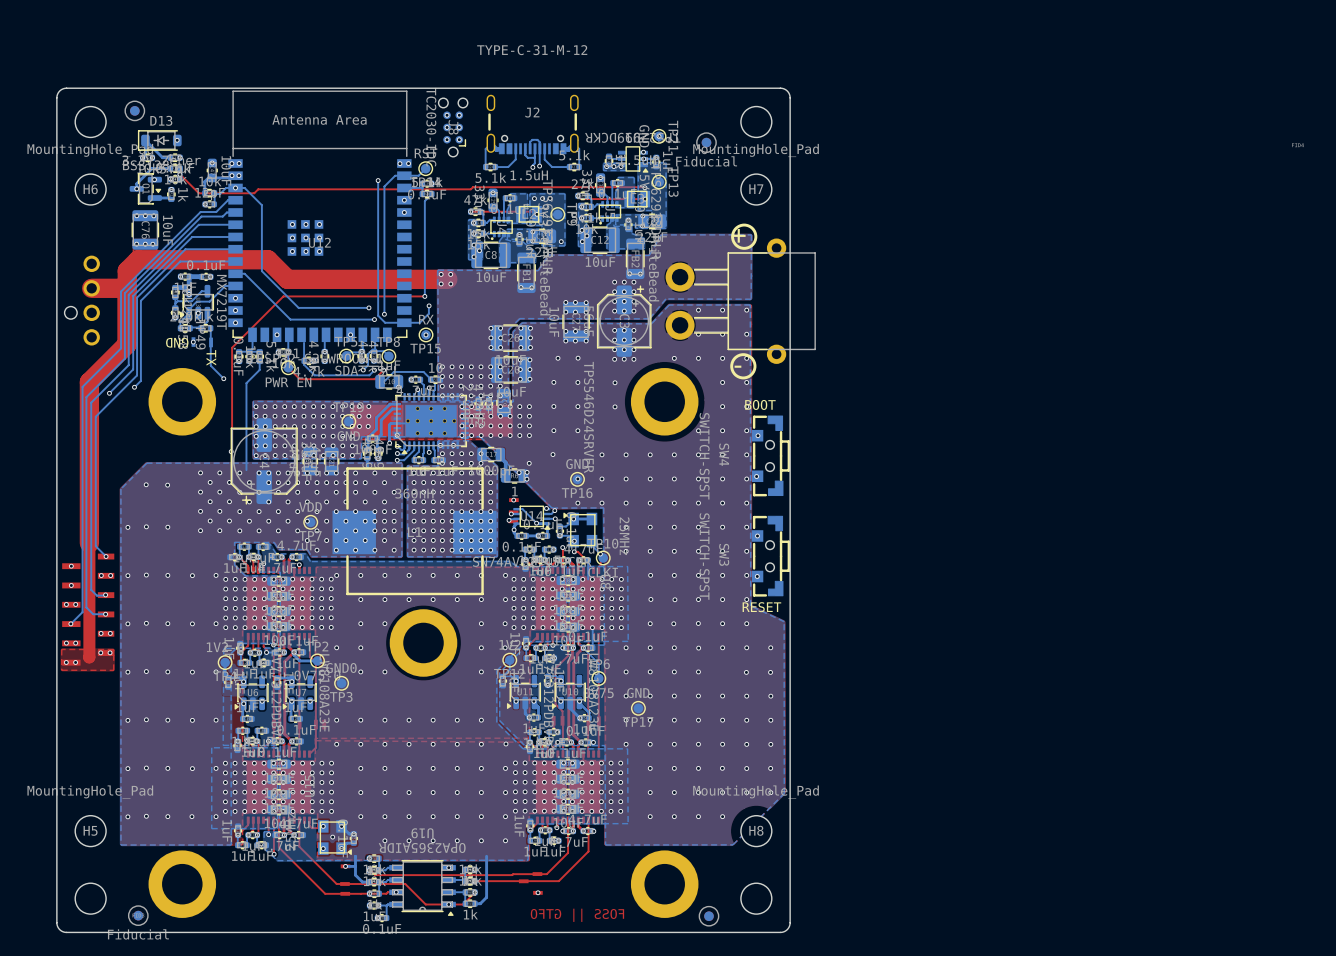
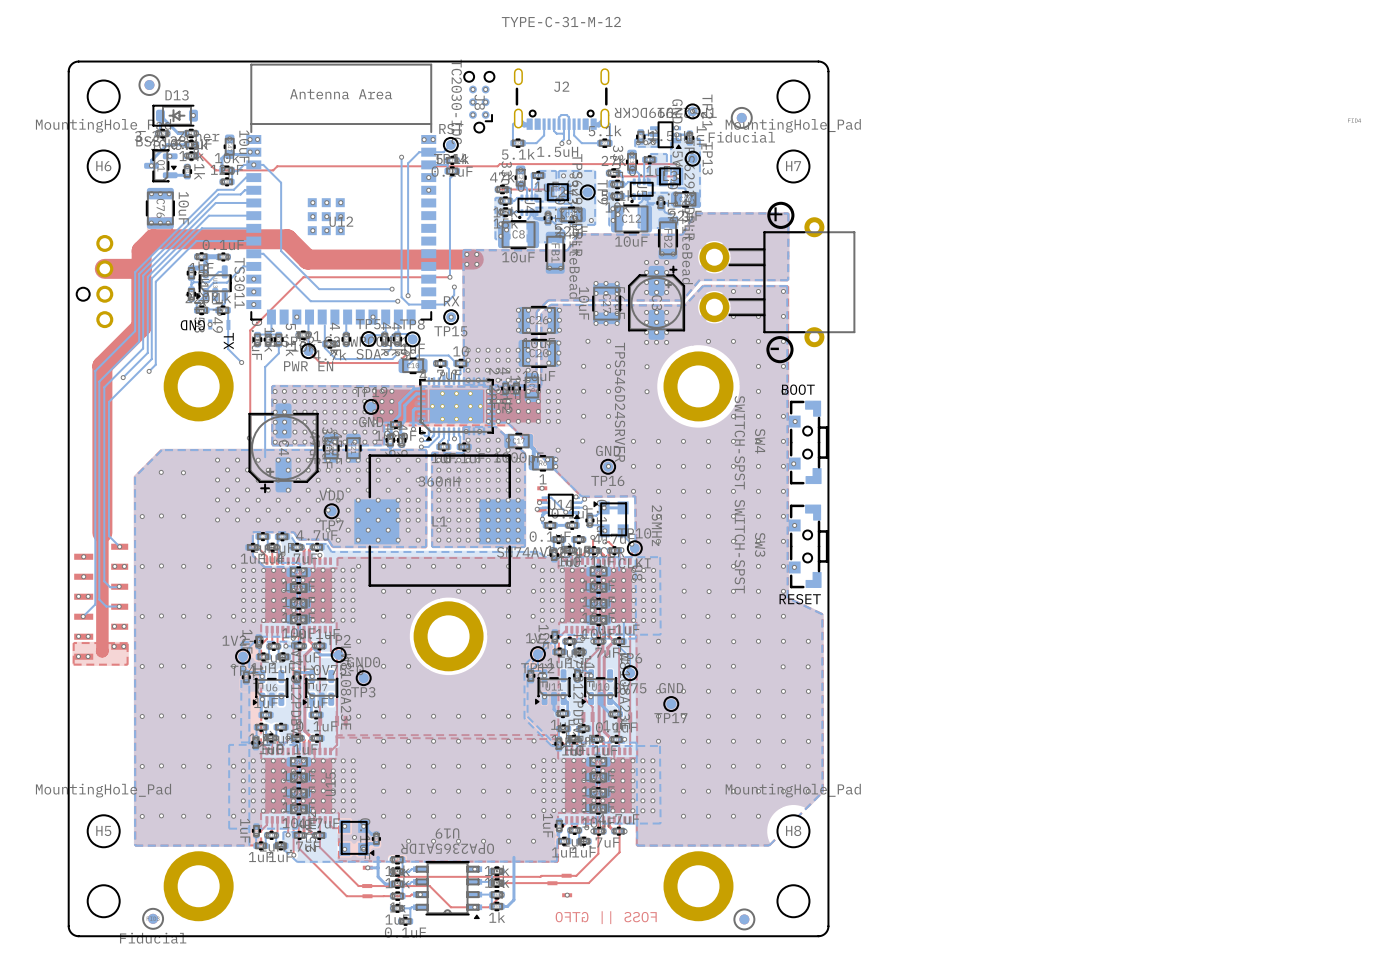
part value: MX7219T (221, 302) -> TS3011 (239, 283)

